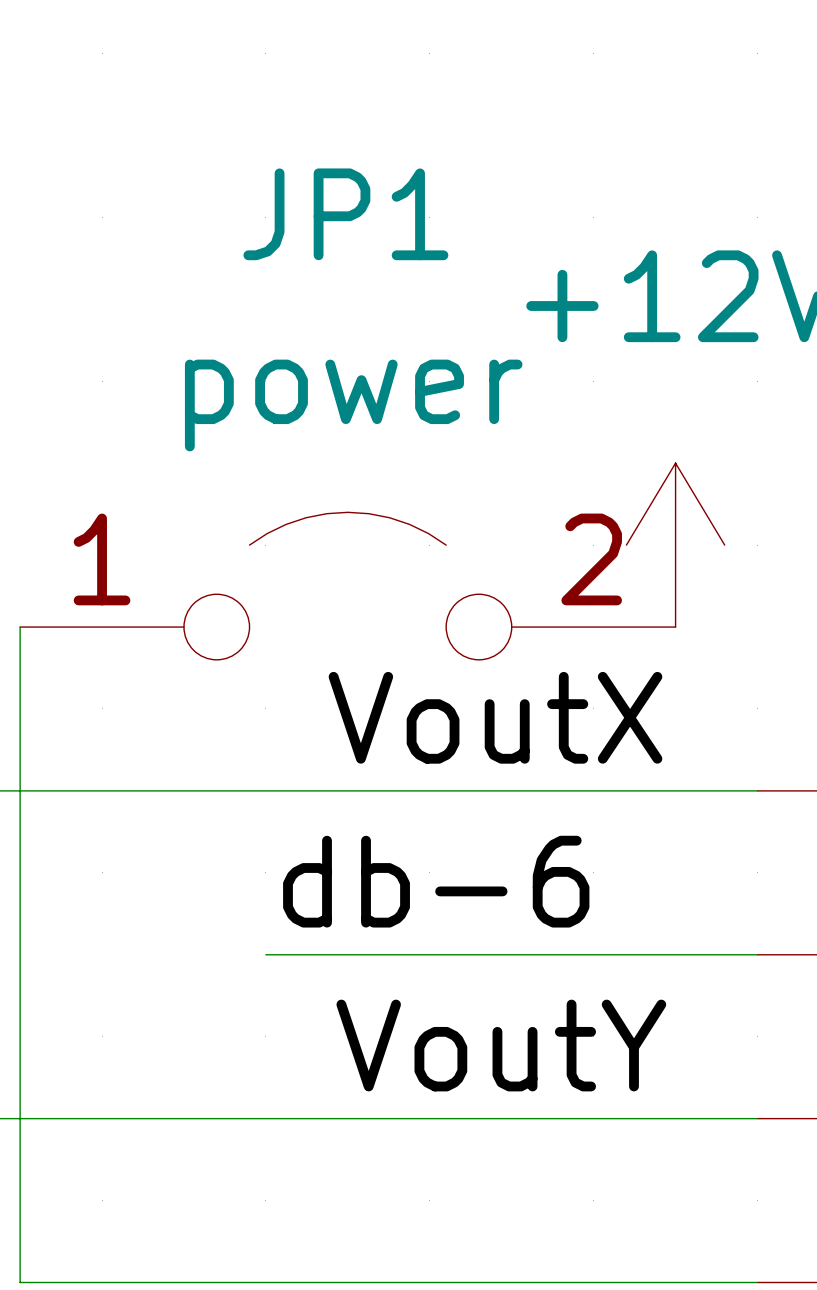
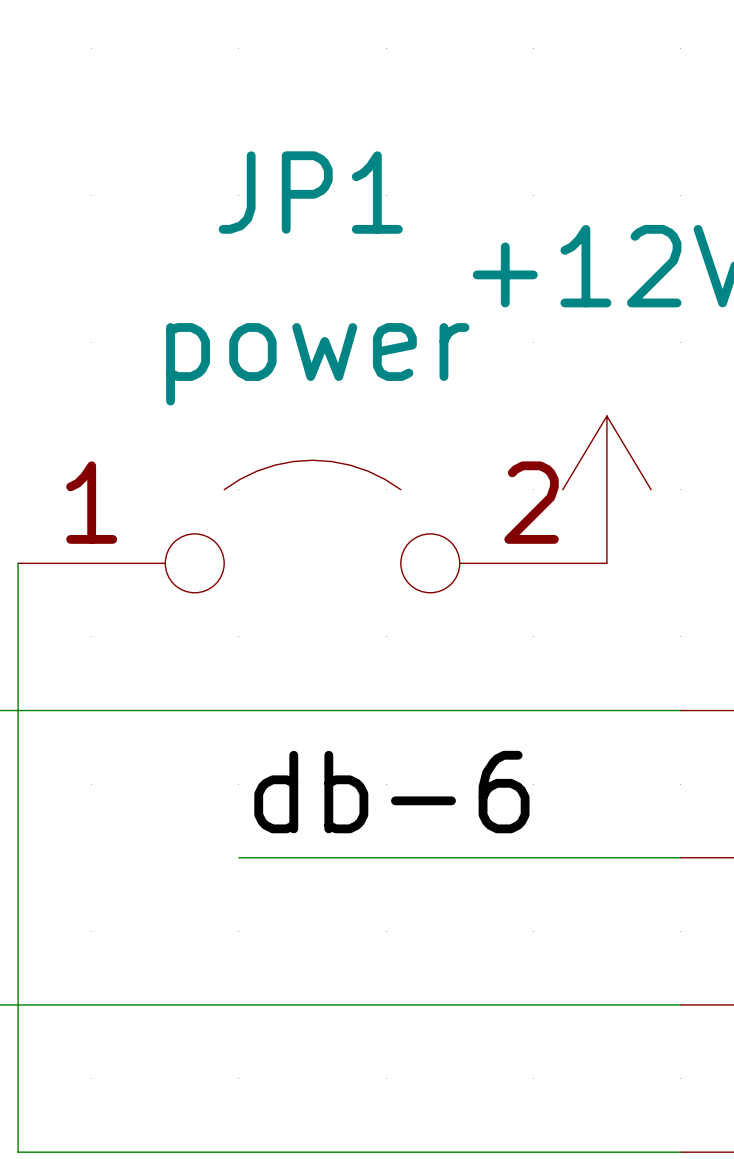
label: VoutX (495, 717) -> none
label: VoutY (501, 1045) -> none

